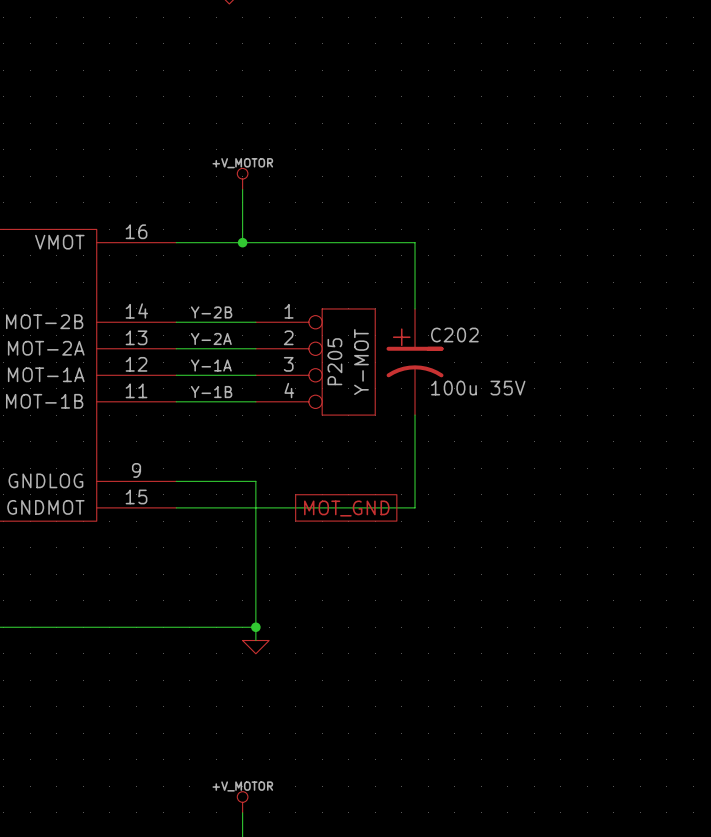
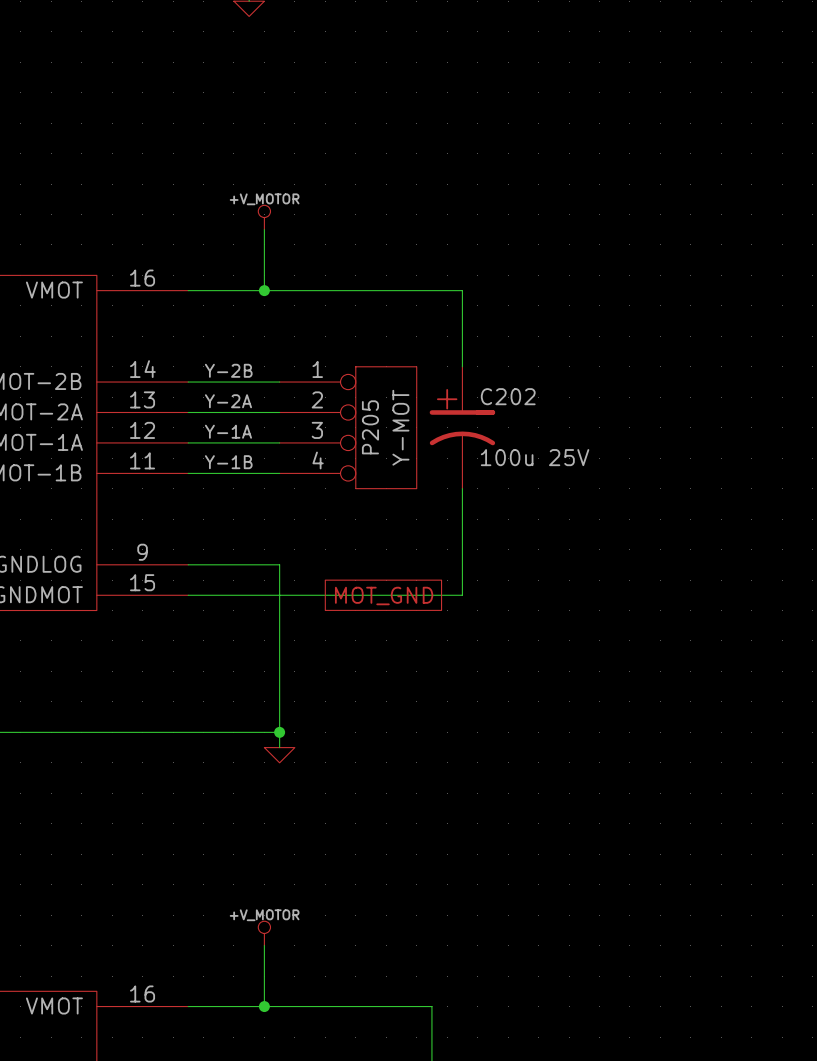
C202 value: 100u 35V (478, 388) -> 100u 25V (535, 457)

